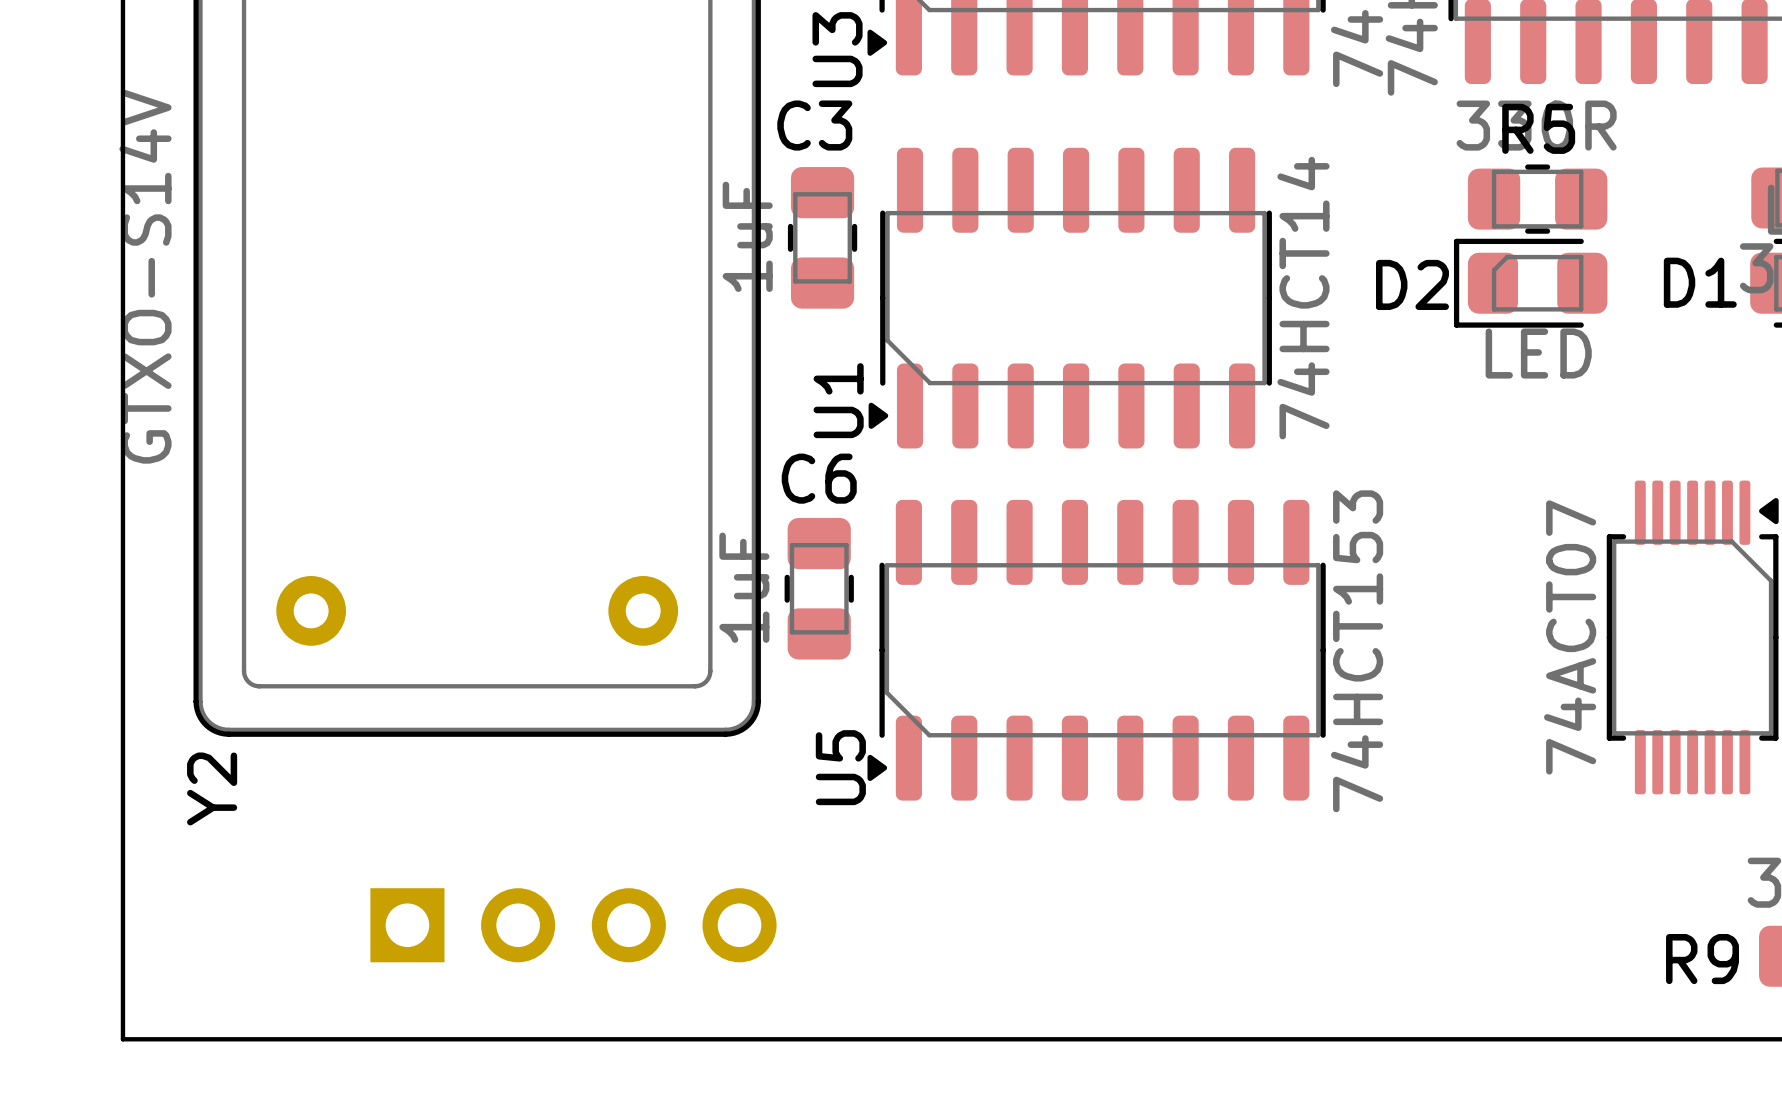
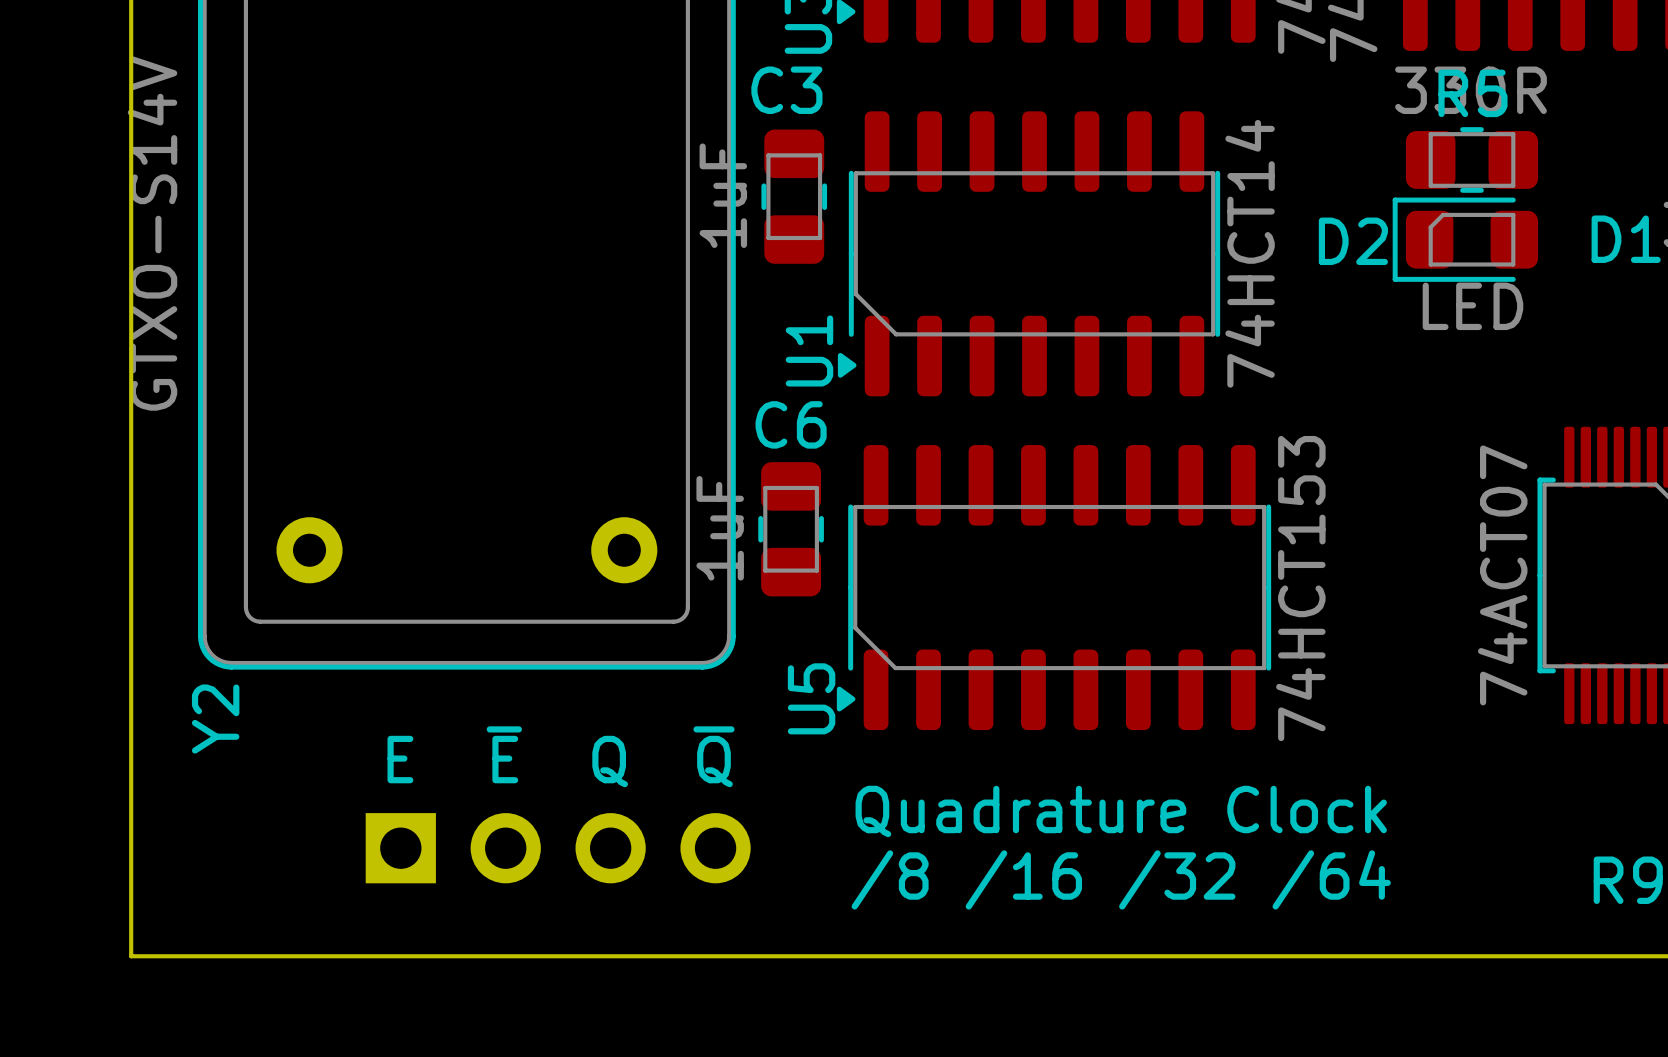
text: none -> ~{E} (504, 754)
text: none -> ~{Q} (713, 756)
text: none -> E (400, 759)
text: none -> Q (610, 761)
text: none -> Quadrature Clock (1121, 811)
text: none -> /8 /16 /32 /64 (1121, 879)

